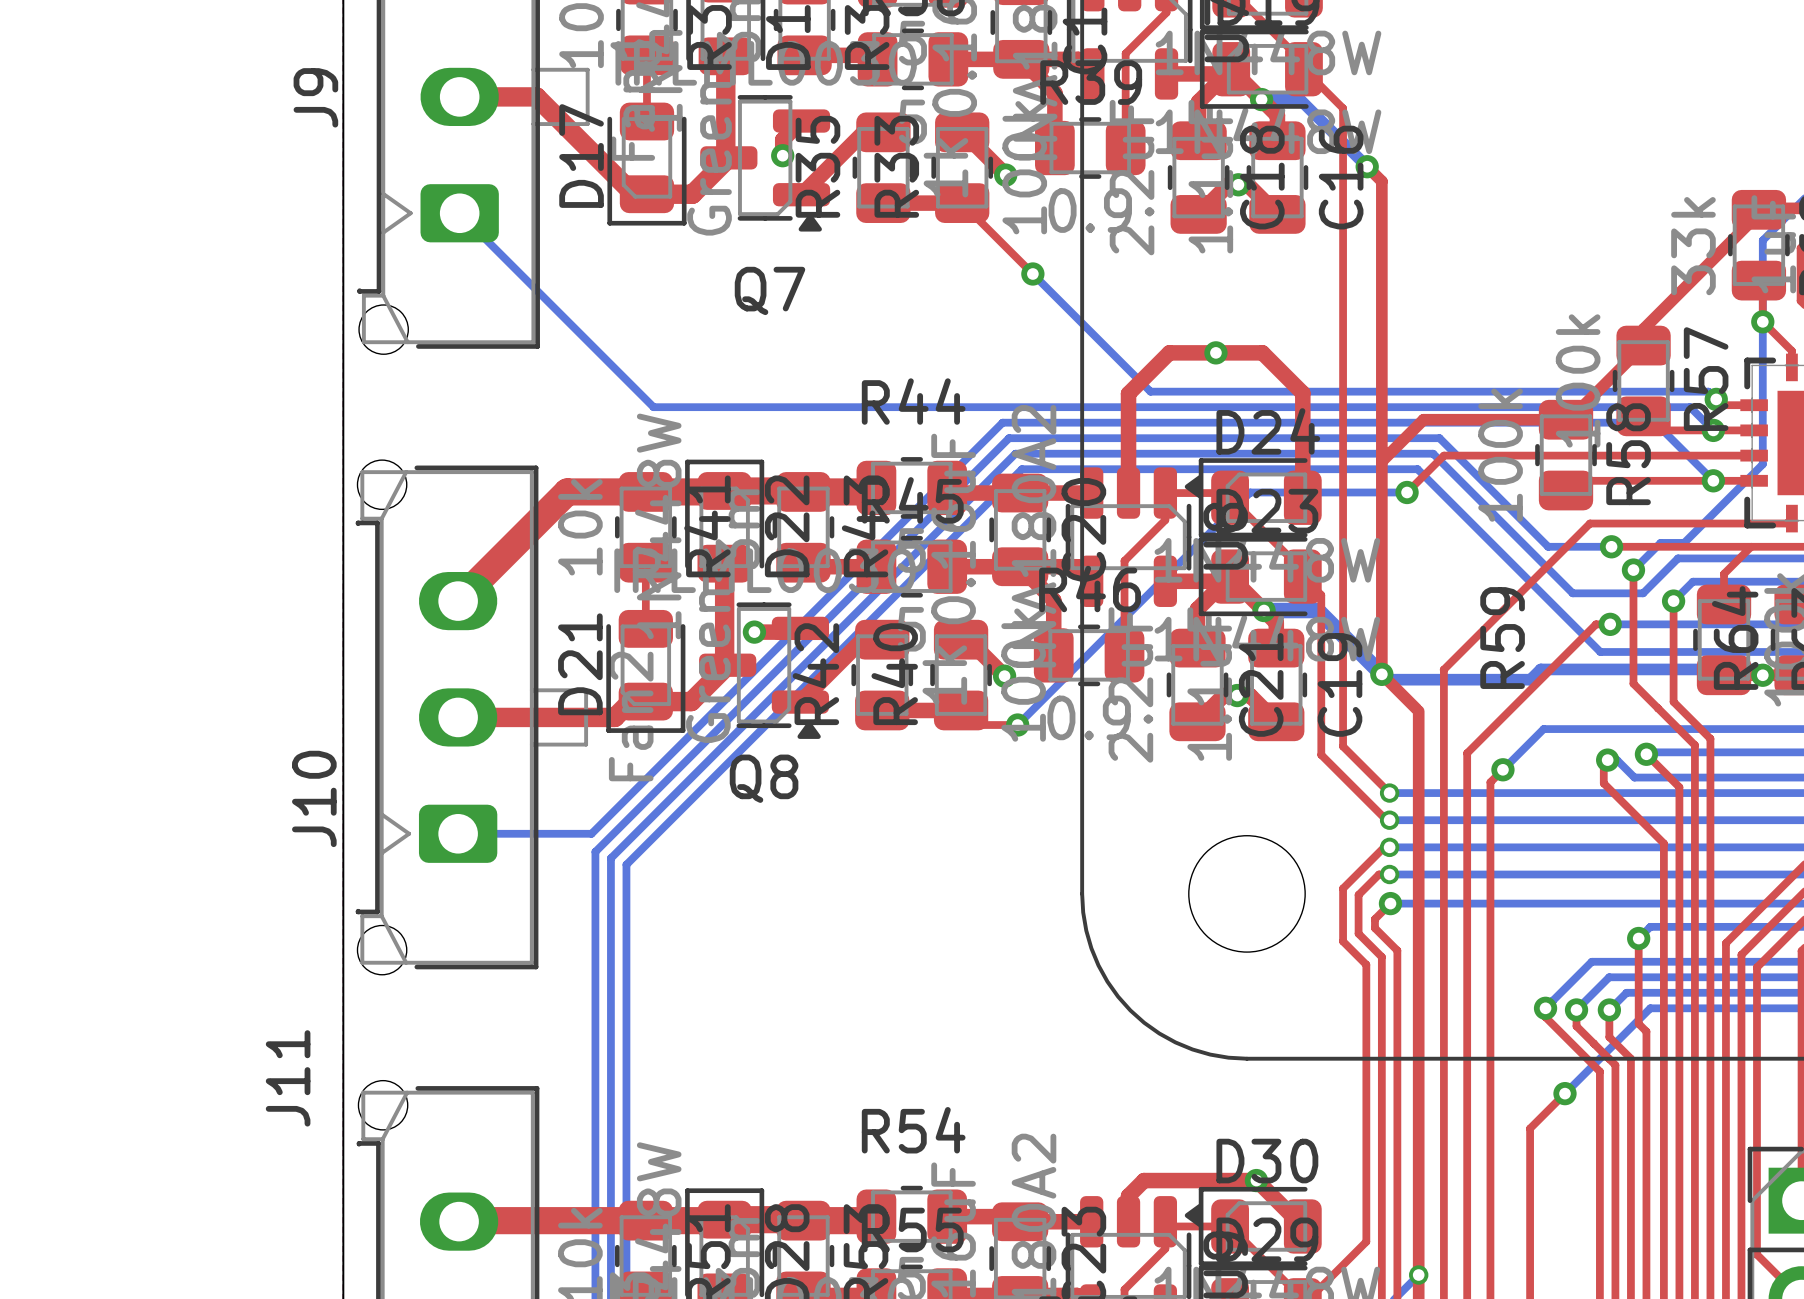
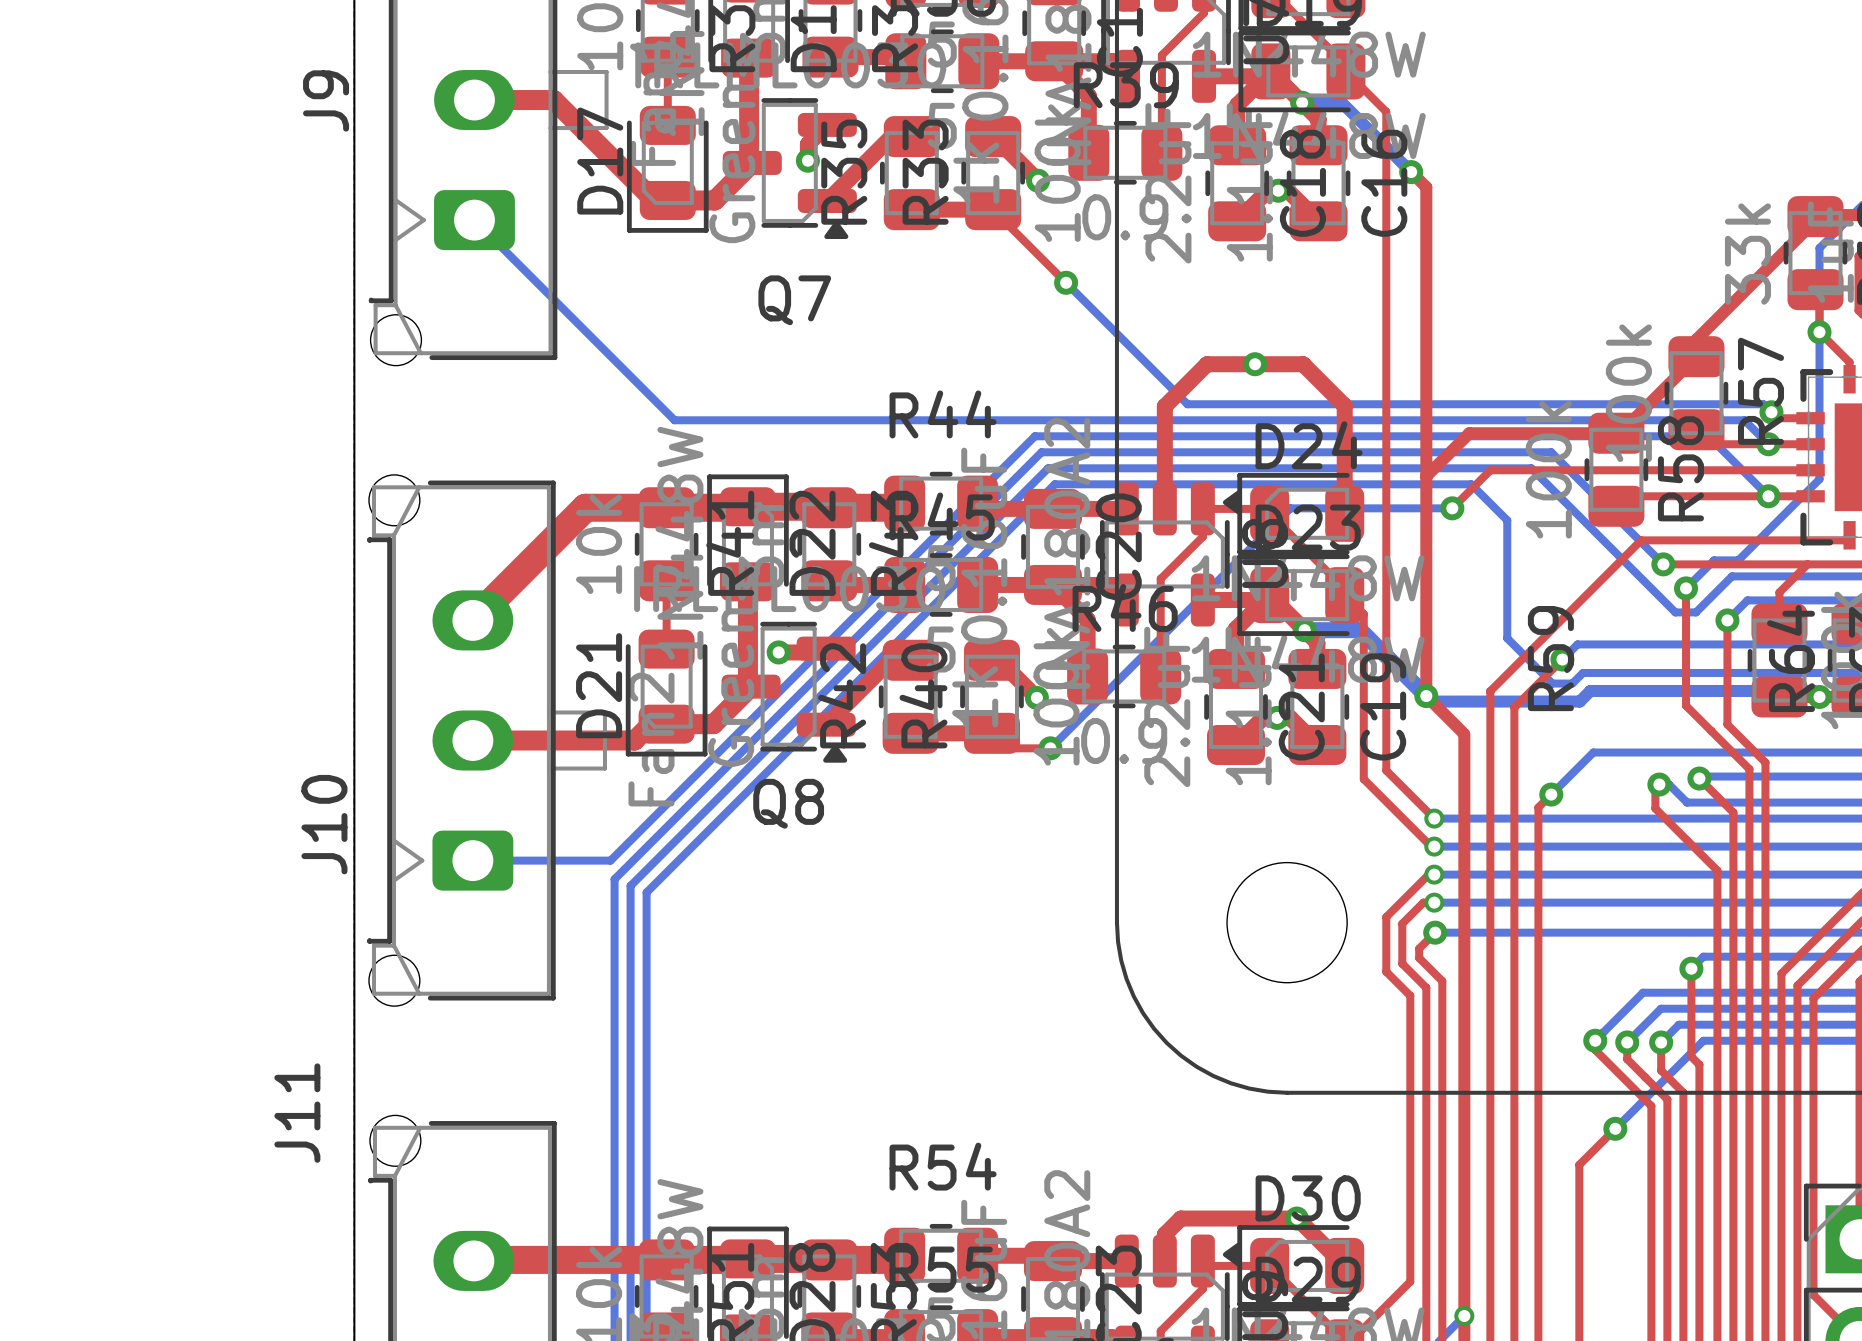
bottom track: (1439, 438) (1548, 546) (1611, 546) -> (1485, 452) (1551, 452) (1663, 564)
bottom track: (1433, 453) (1572, 593) (1623, 593) -> (1479, 468) (1531, 468) (1675, 612)
bottom track: (1417, 469) (1600, 651) -> (1463, 484) (1471, 484) (1507, 520) (1507, 638) (1552, 683) (1572, 683) (1582, 672) (1651, 672)
top track: (1610, 624) (1596, 624) (1467, 753) -> (1562, 659) (1514, 707) (1514, 777)
bottom track: none -> (1662, 644) (1577, 644) (1562, 659)
via position: (1610, 624) -> (1562, 659)

